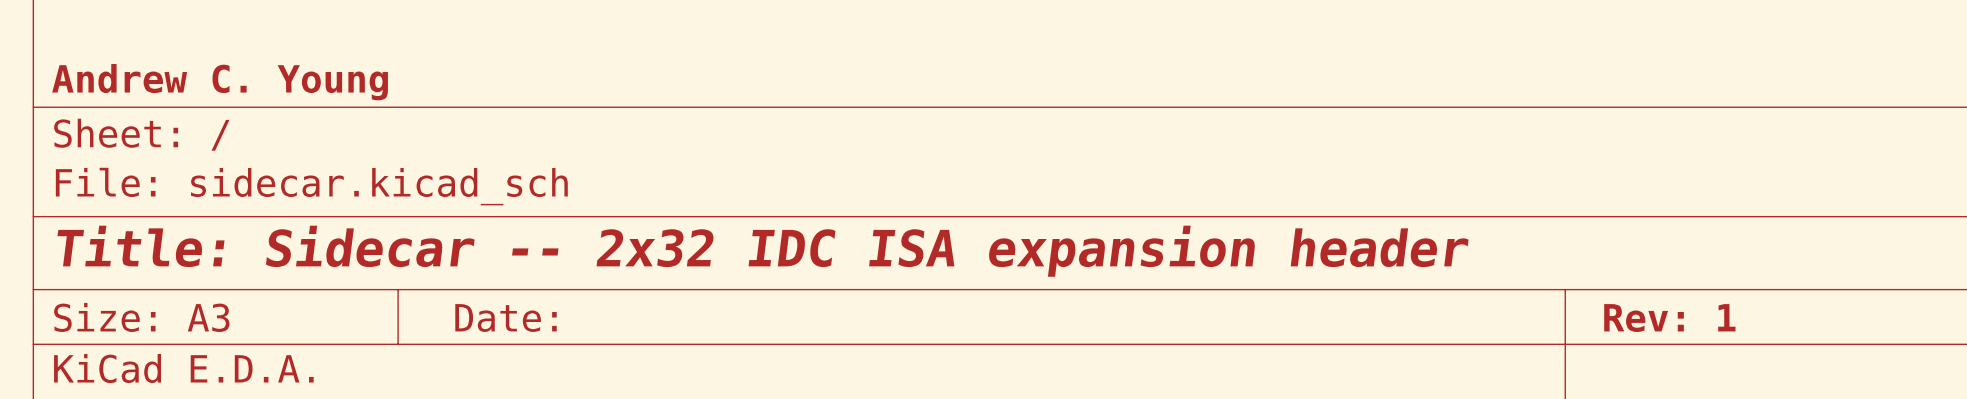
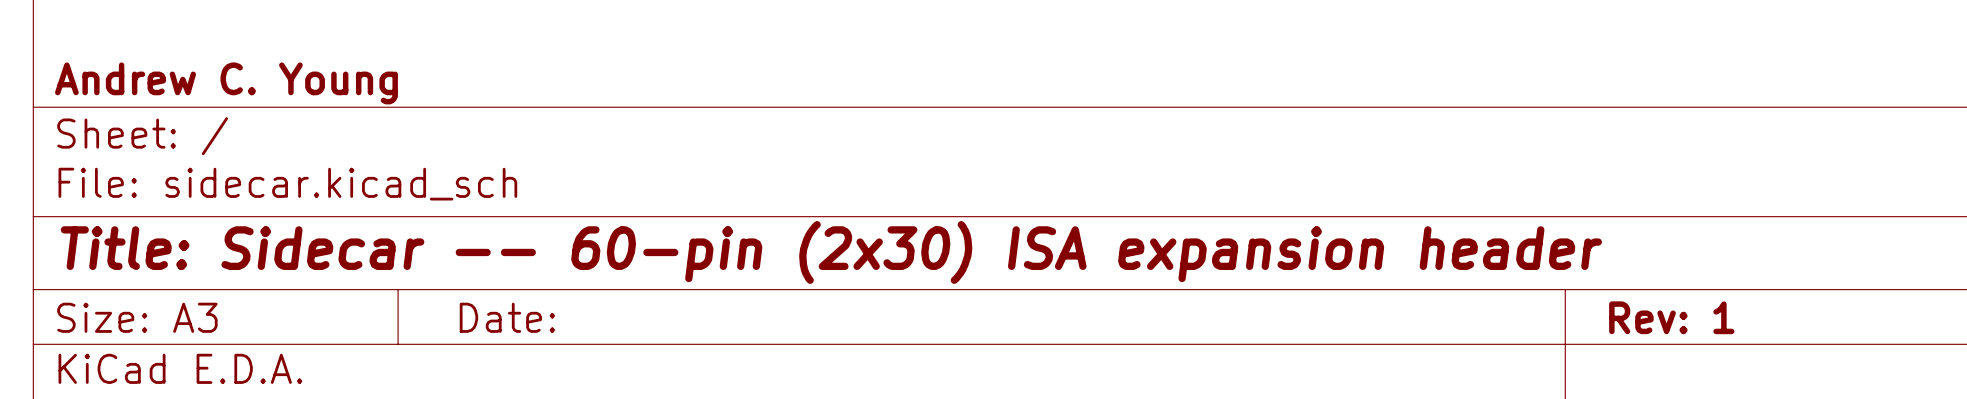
title block: Title: Sidecar -- 2x32 IDC ISA expansion header (763, 251) -> Title: Sidecar -- 60-pin (2x30) ISA expansion header (831, 252)

